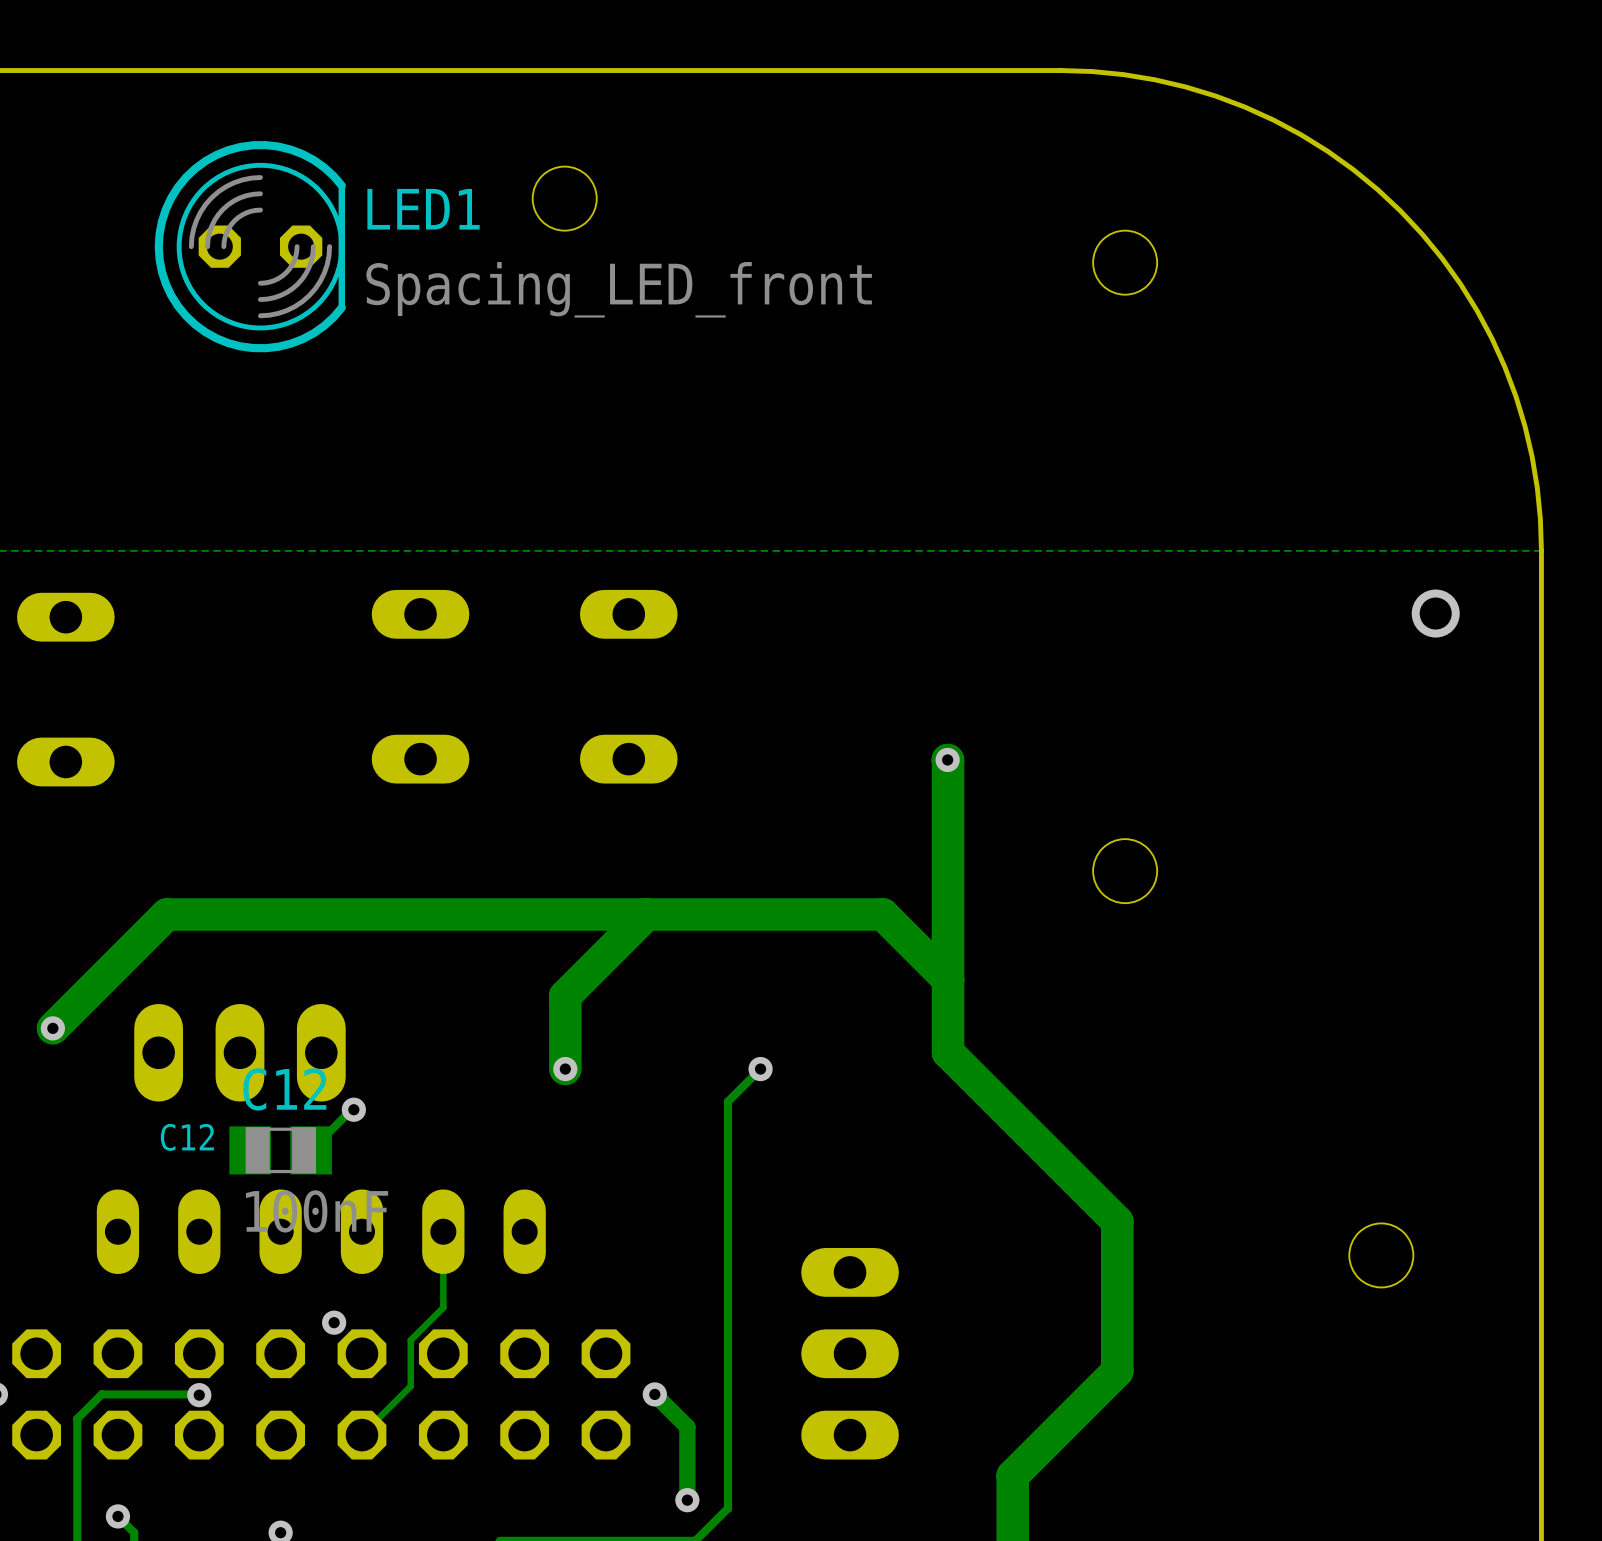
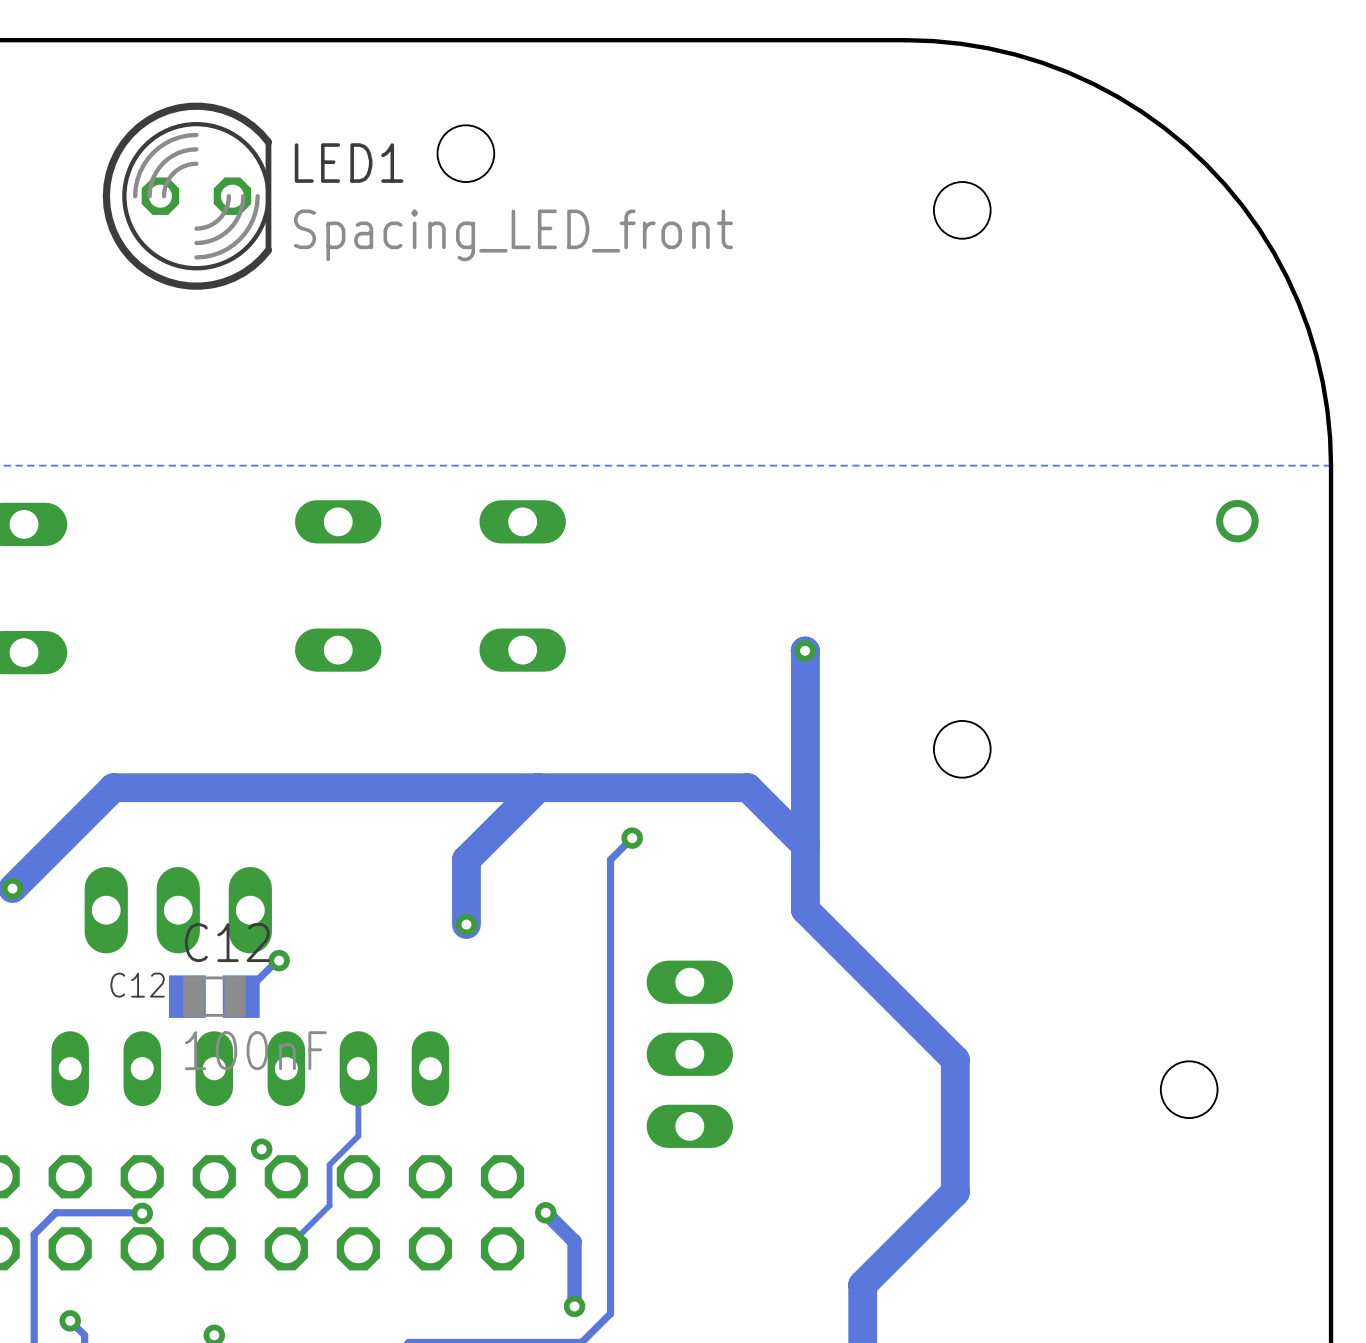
track: (760, 1069) (728, 1101) -> (632, 838) (610, 859) (610, 953)
via position: (760, 1069) -> (632, 838)
part position: (850, 1353) -> (689, 1054)

